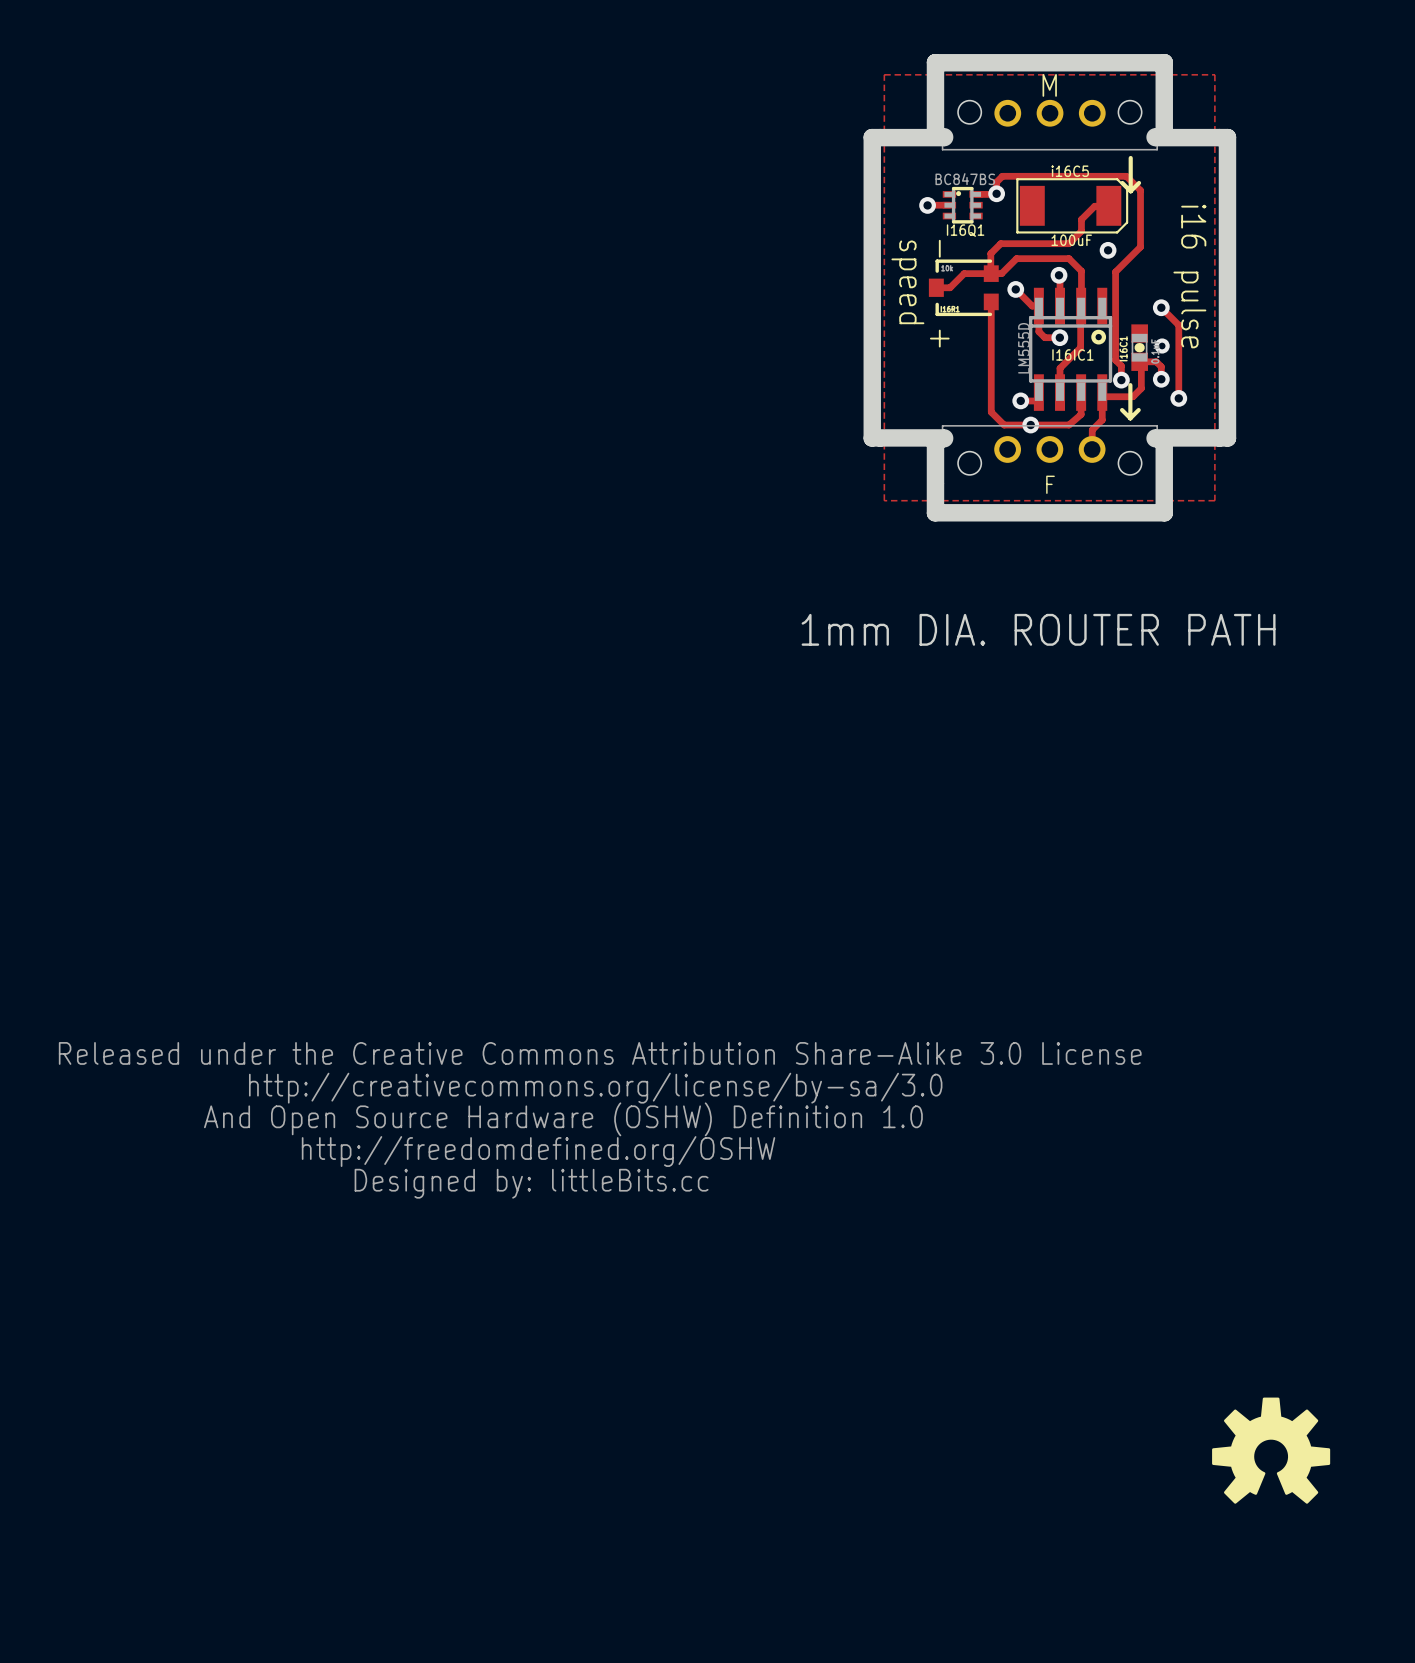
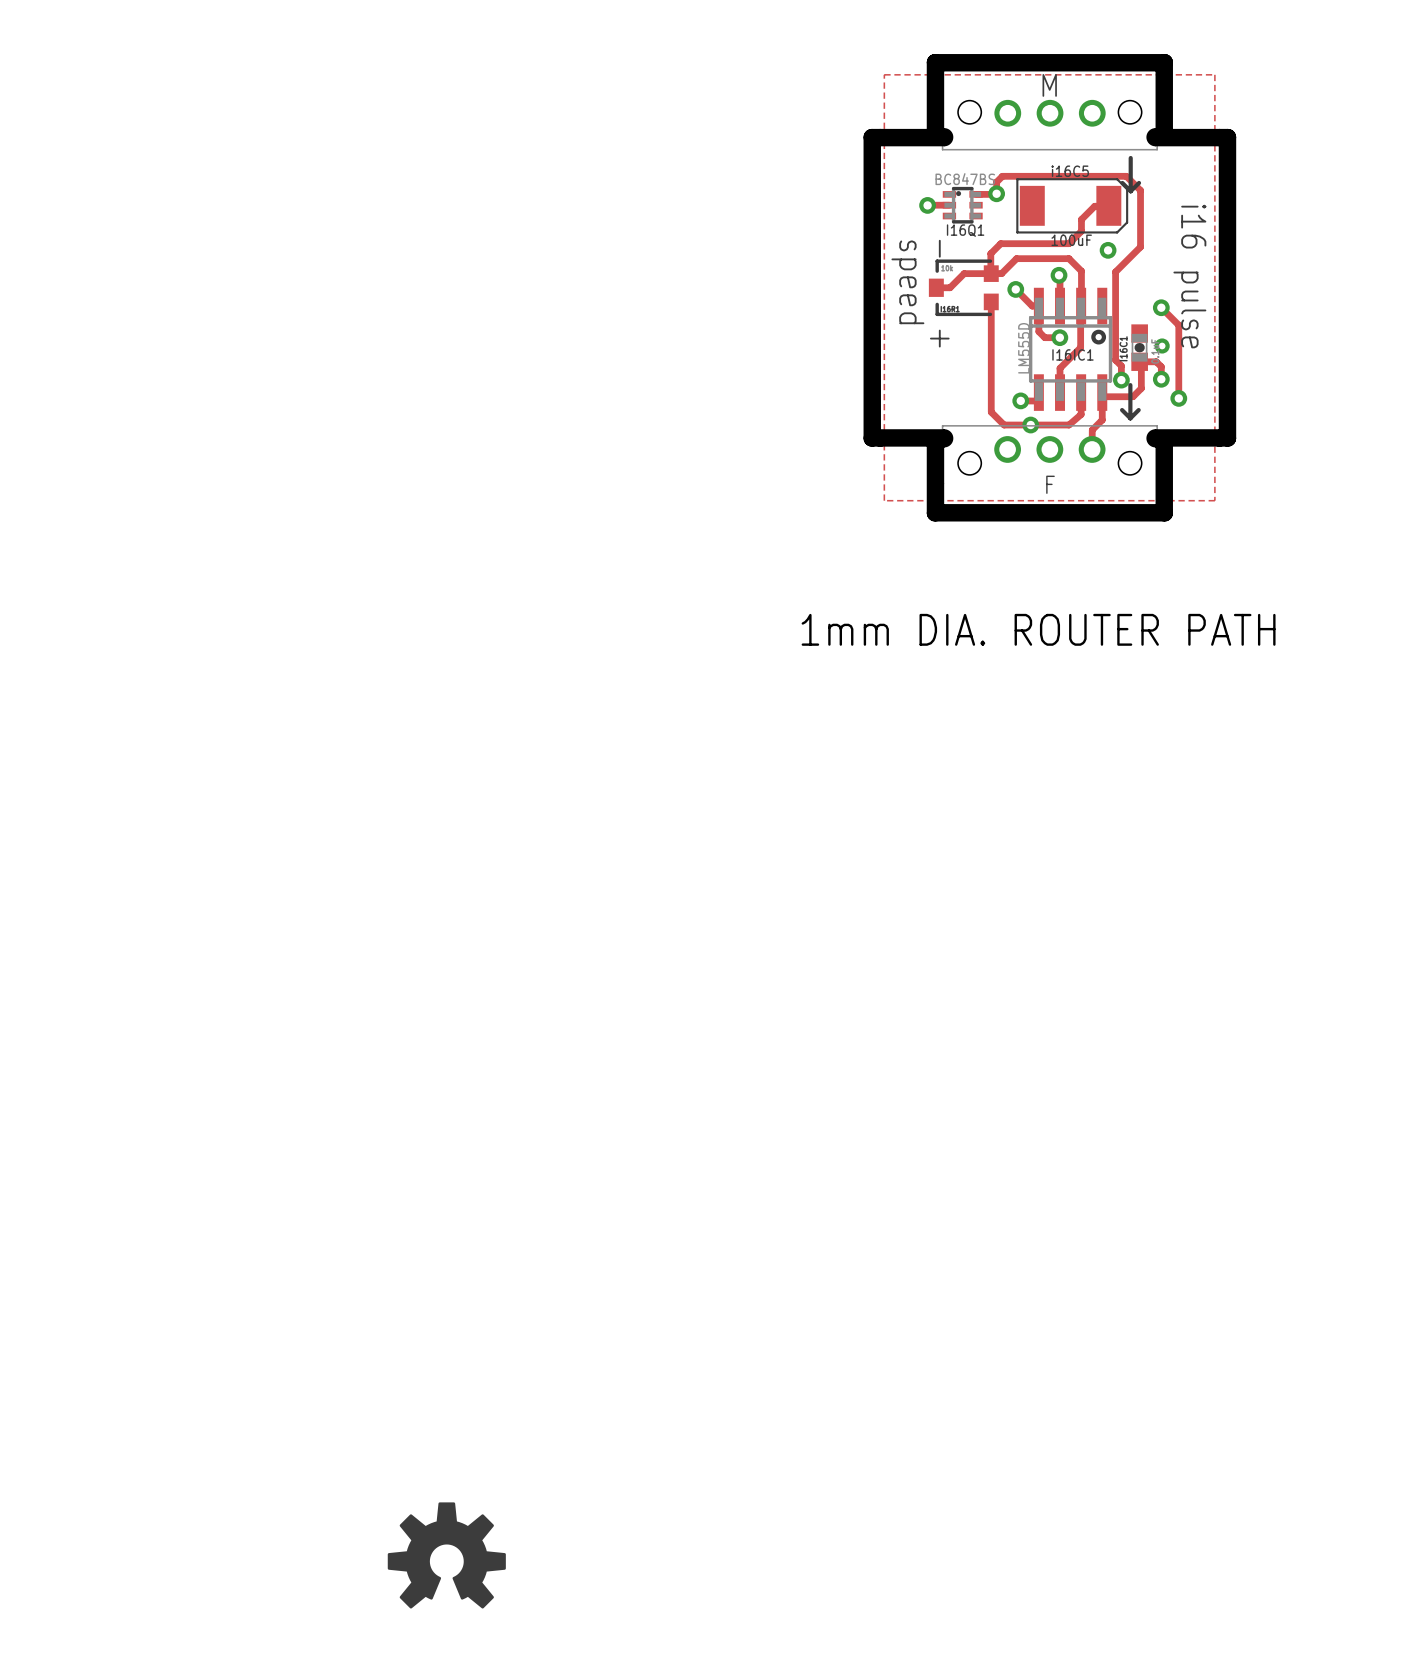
drawing: [58, 1042, 1142, 1199] -> none
drawing: [1212, 1397, 1331, 1504] -> none
drawing: none -> [387, 1502, 506, 1609]

